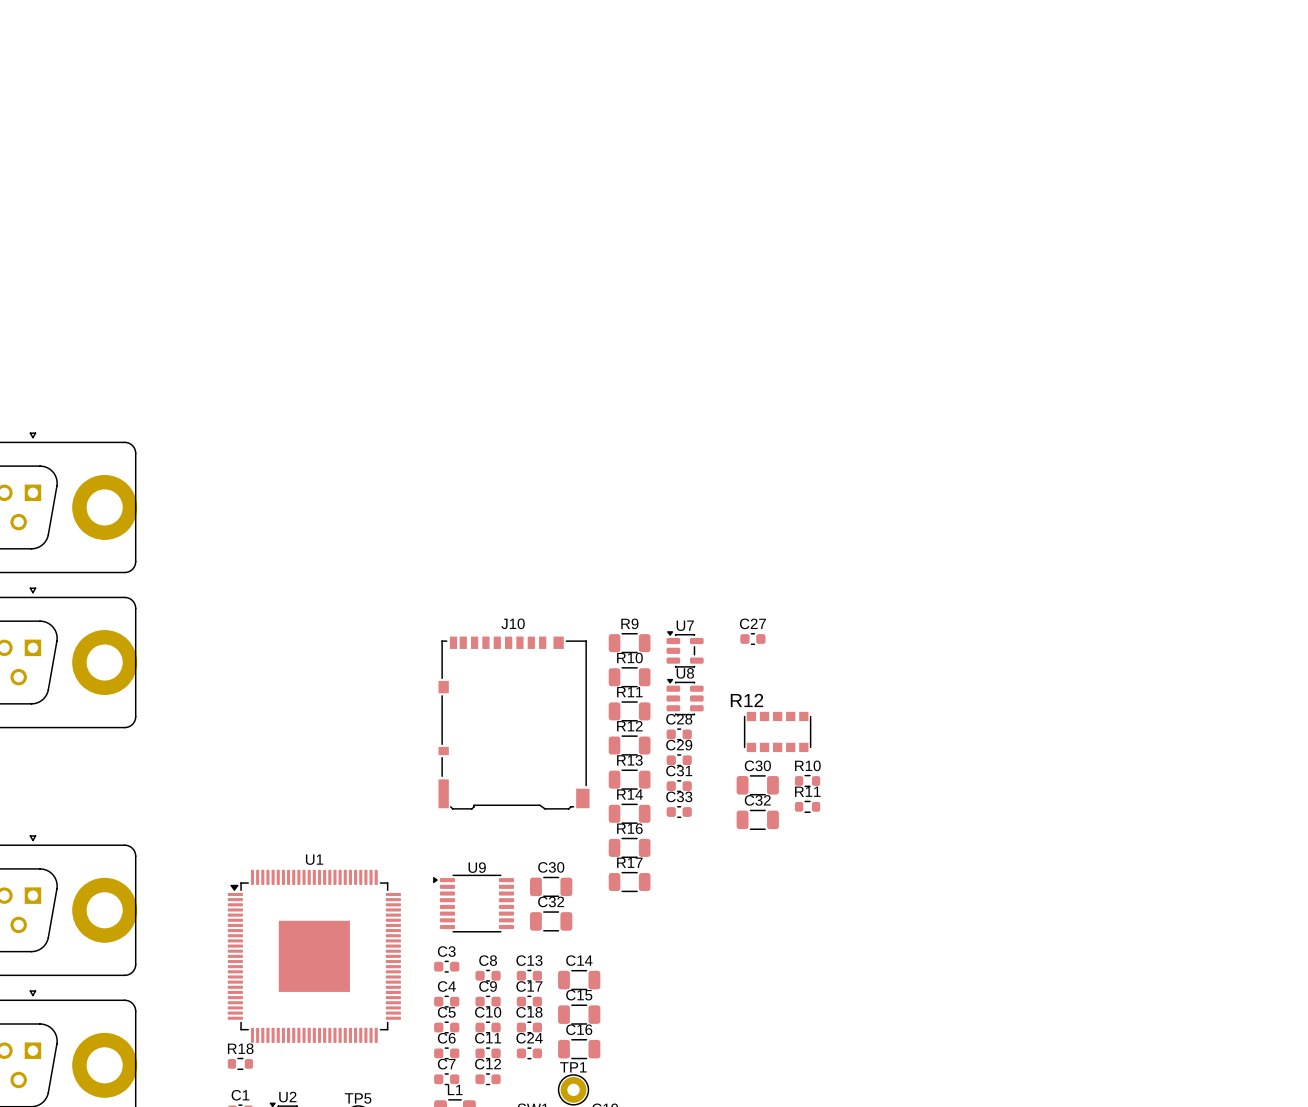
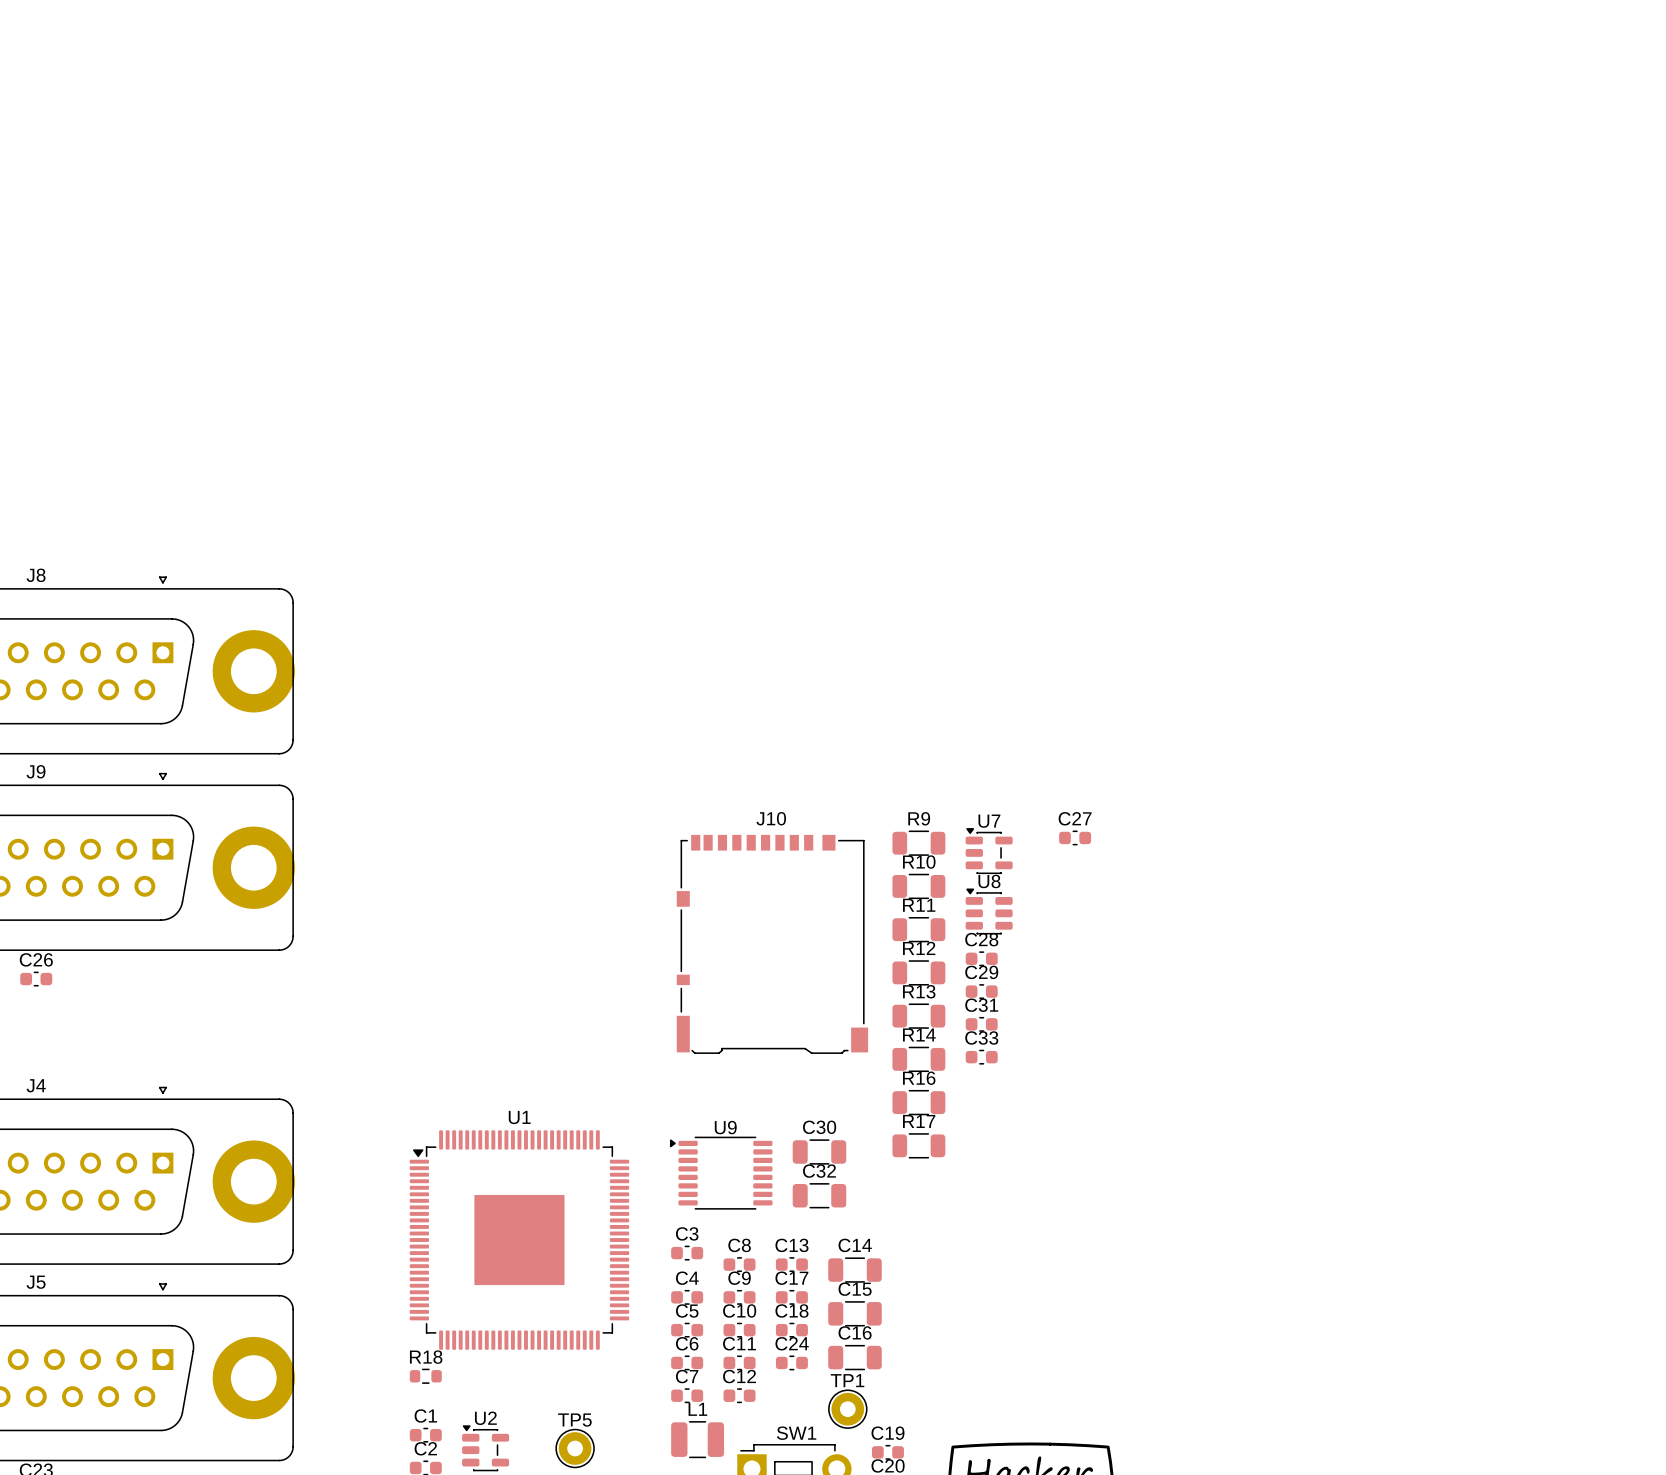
R12: (777, 731) -> none
R10: (807, 780) -> none
C30: (757, 785) -> none
R11: (807, 806) -> none
C32: (757, 819) -> none

